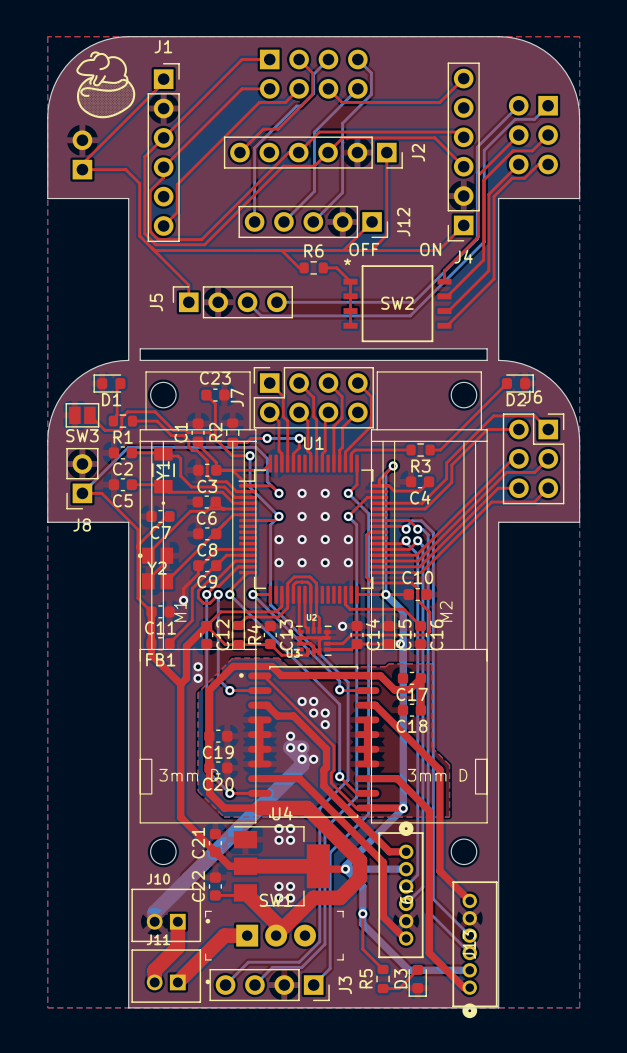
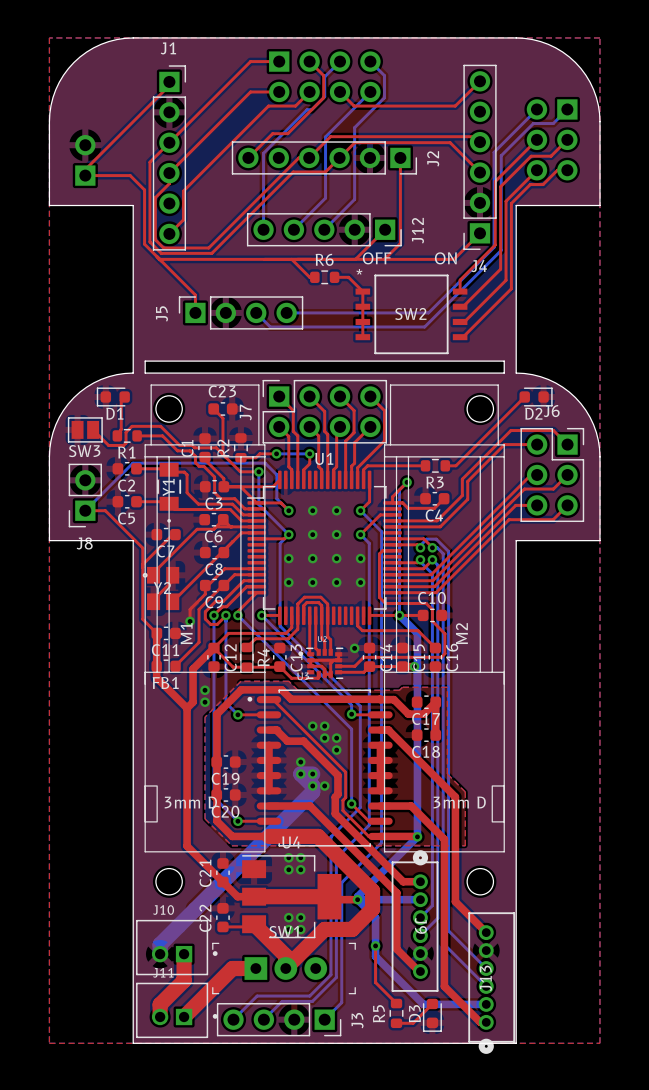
drawing: [76, 51, 136, 119] -> none

